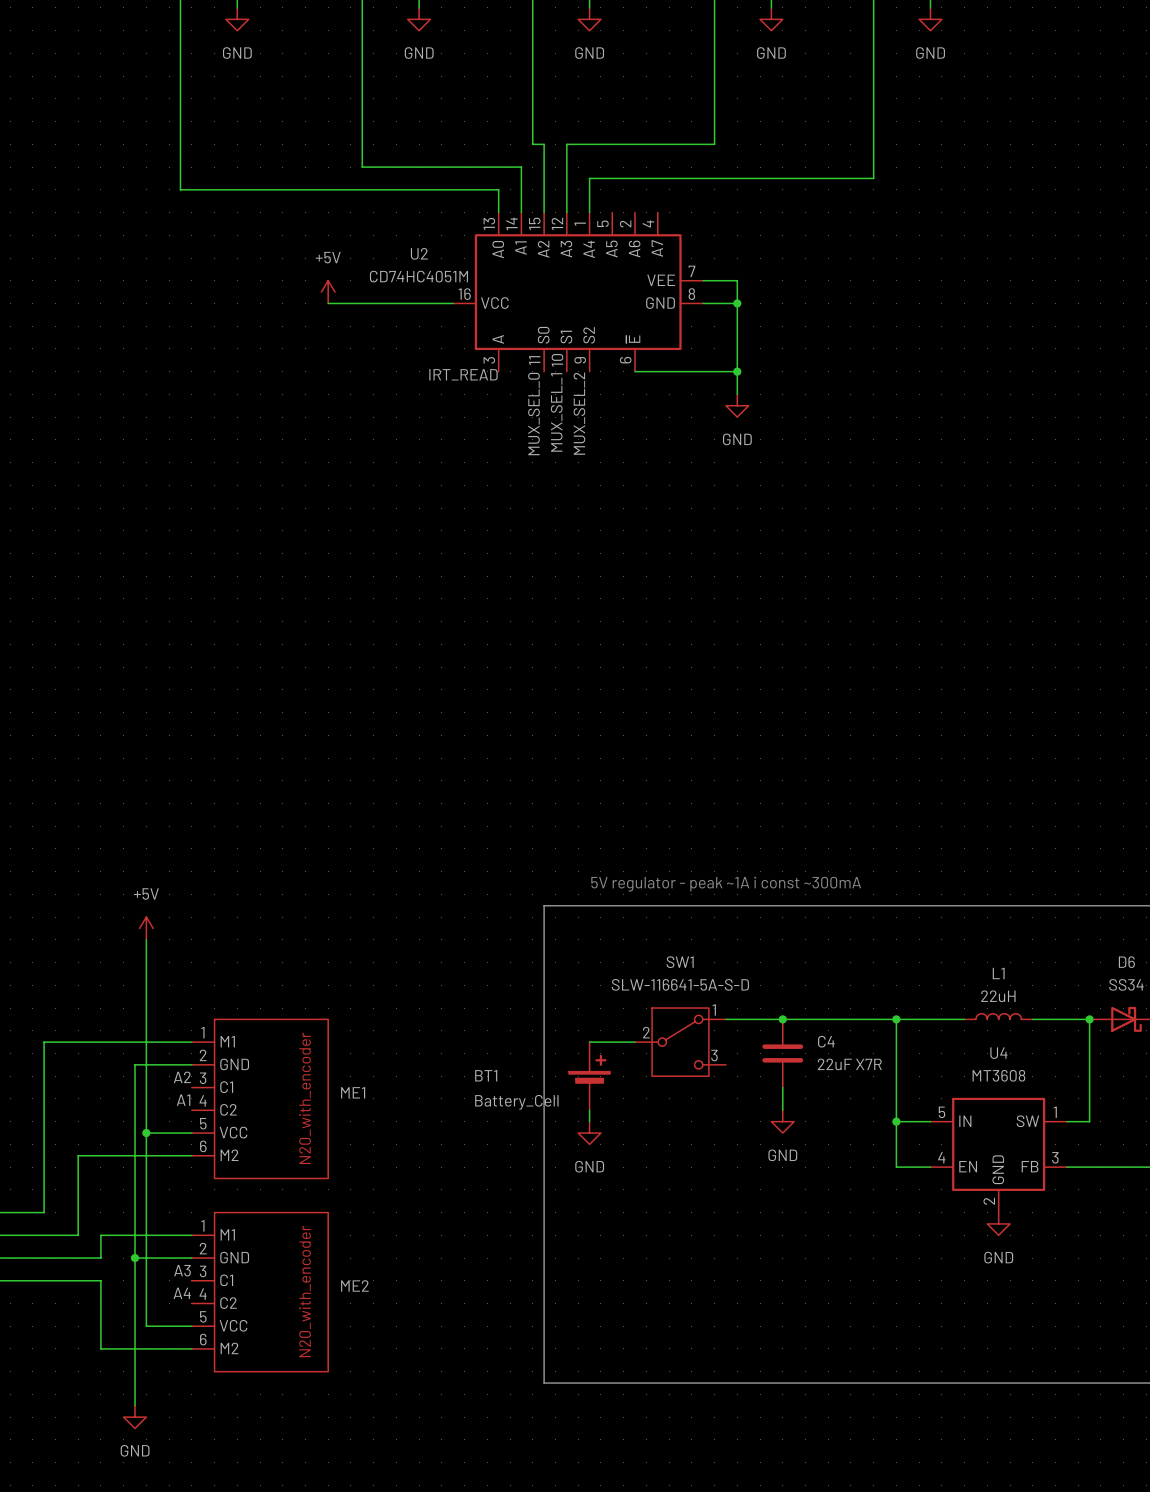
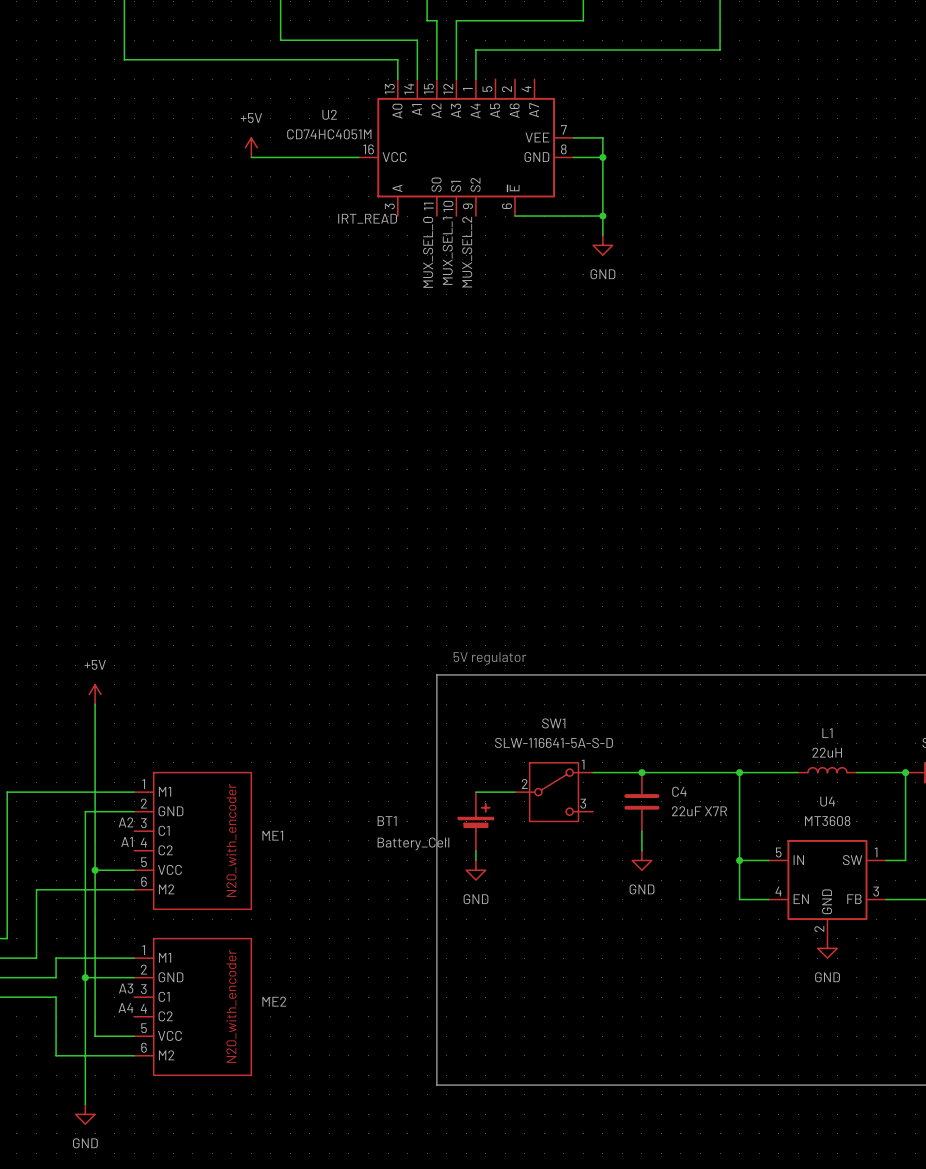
text: 5V regulator - peak ~1A i const ~300mA (726, 884) -> none
text: none -> 5V regulator (489, 658)

